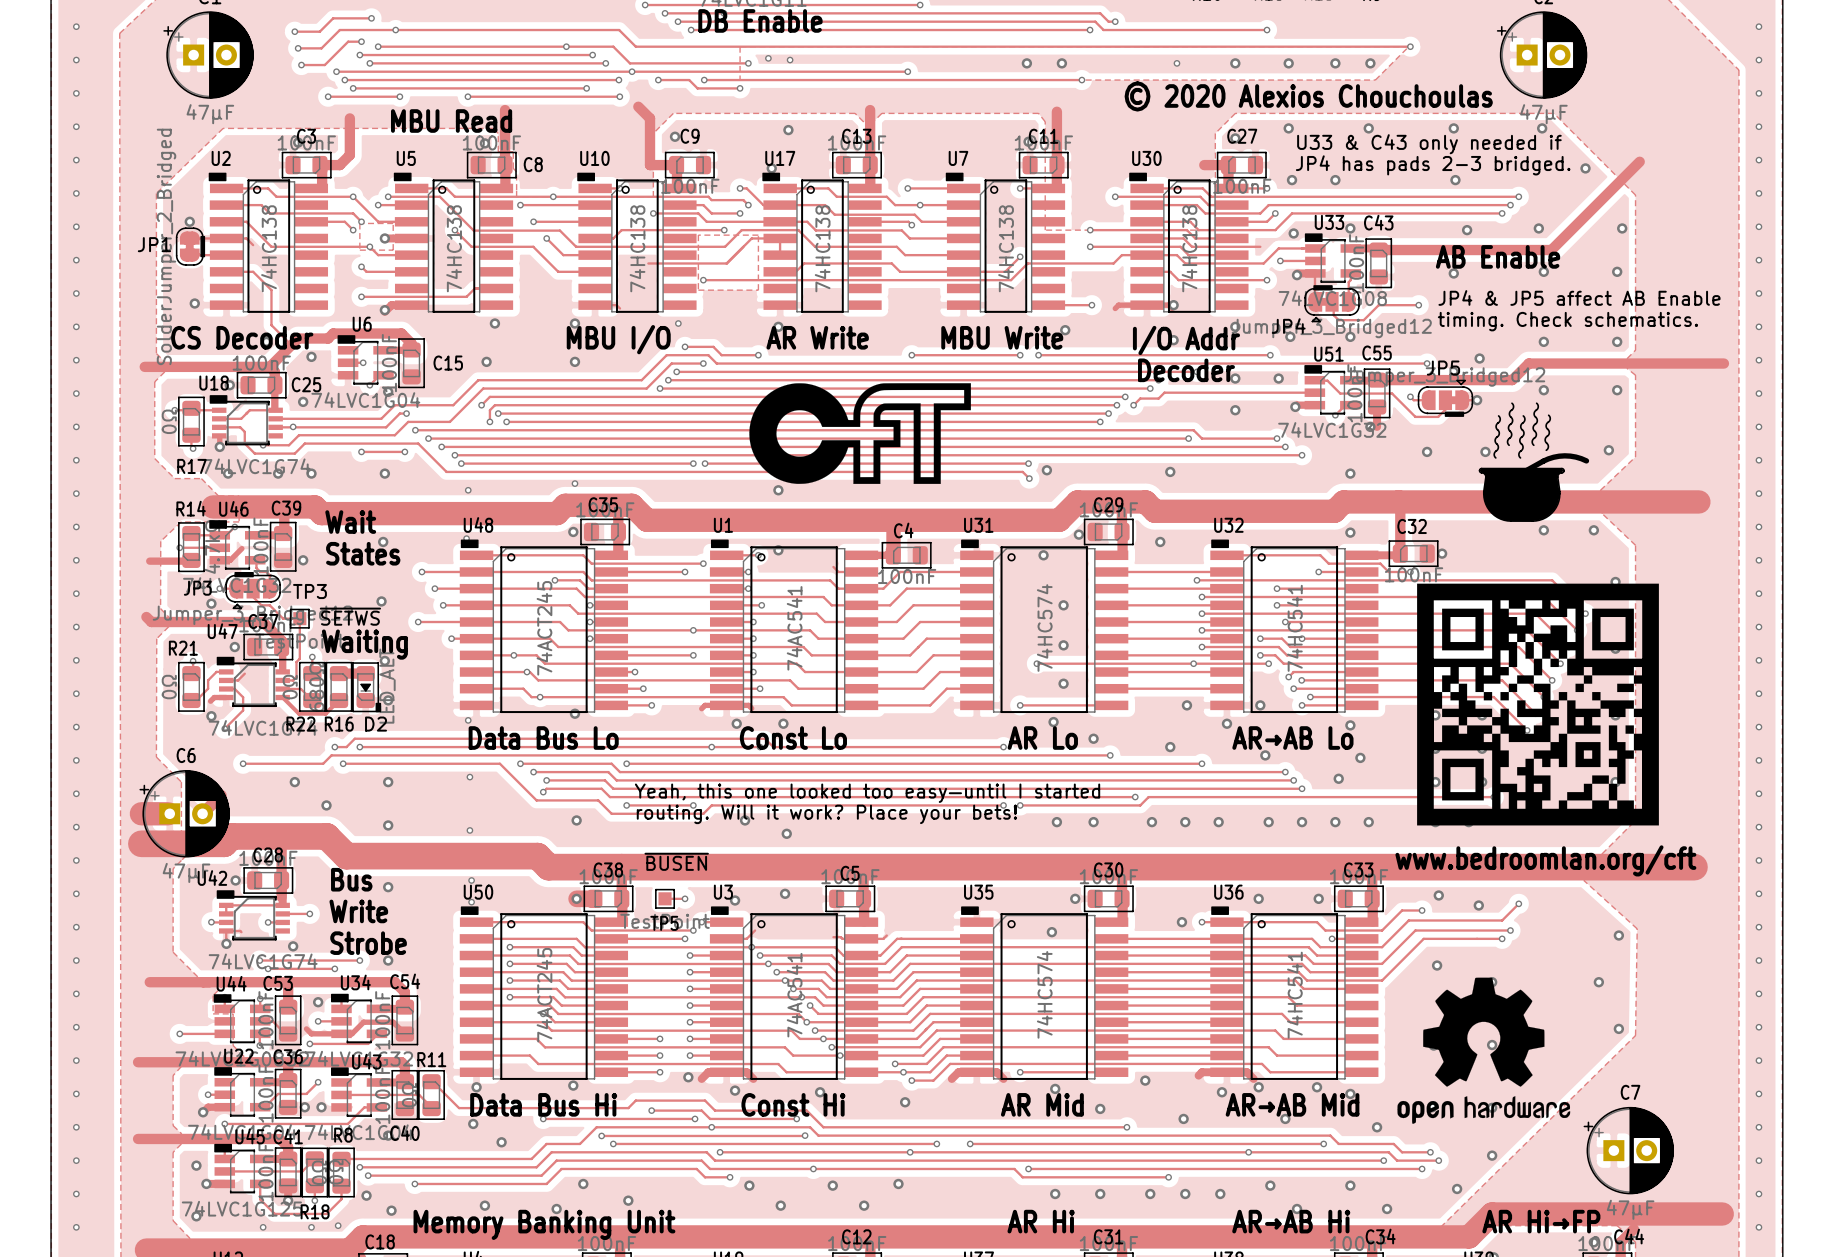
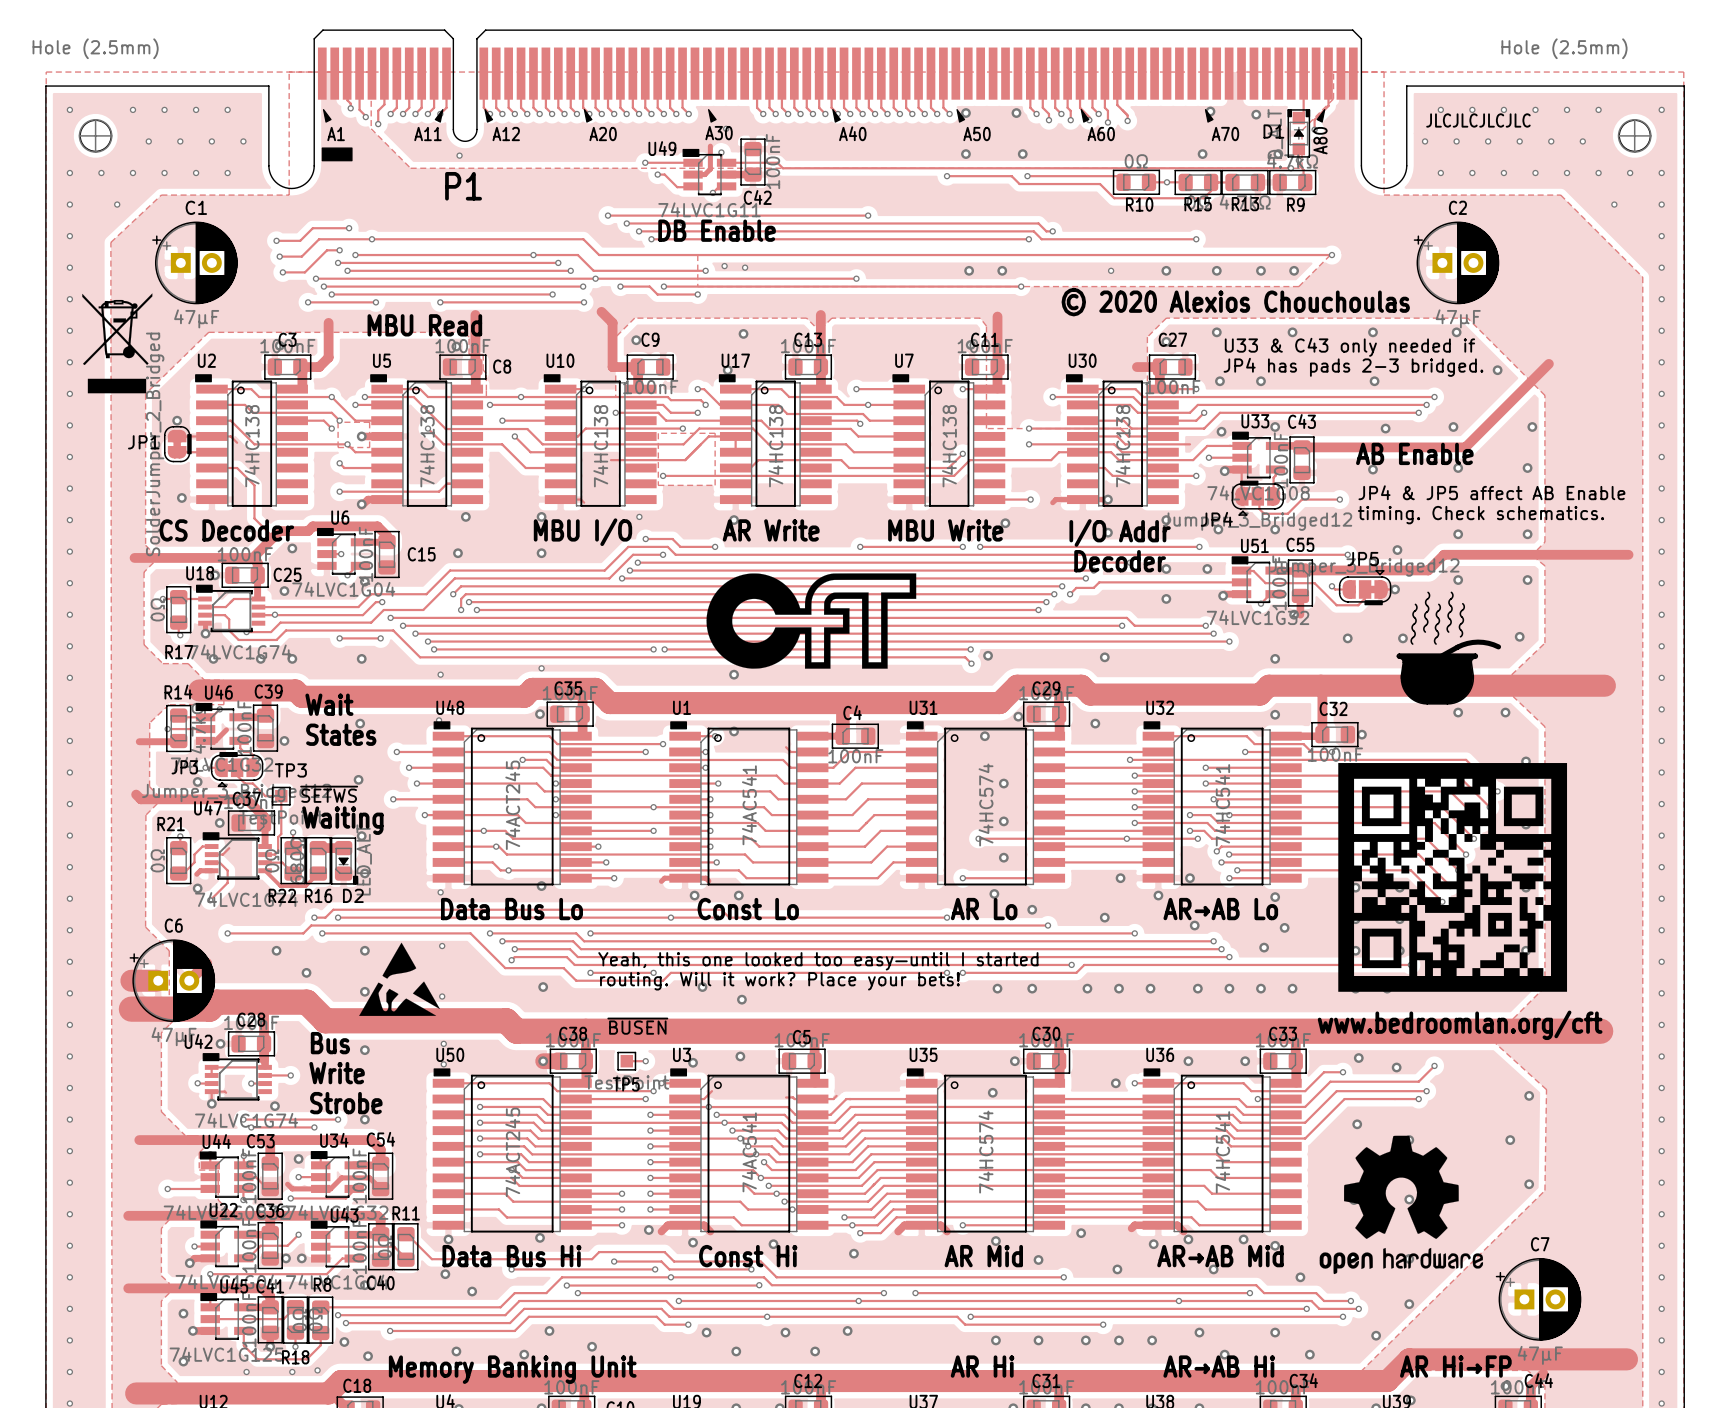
drawing: none -> [82, 293, 153, 394]
drawing: none -> [359, 942, 440, 1016]

